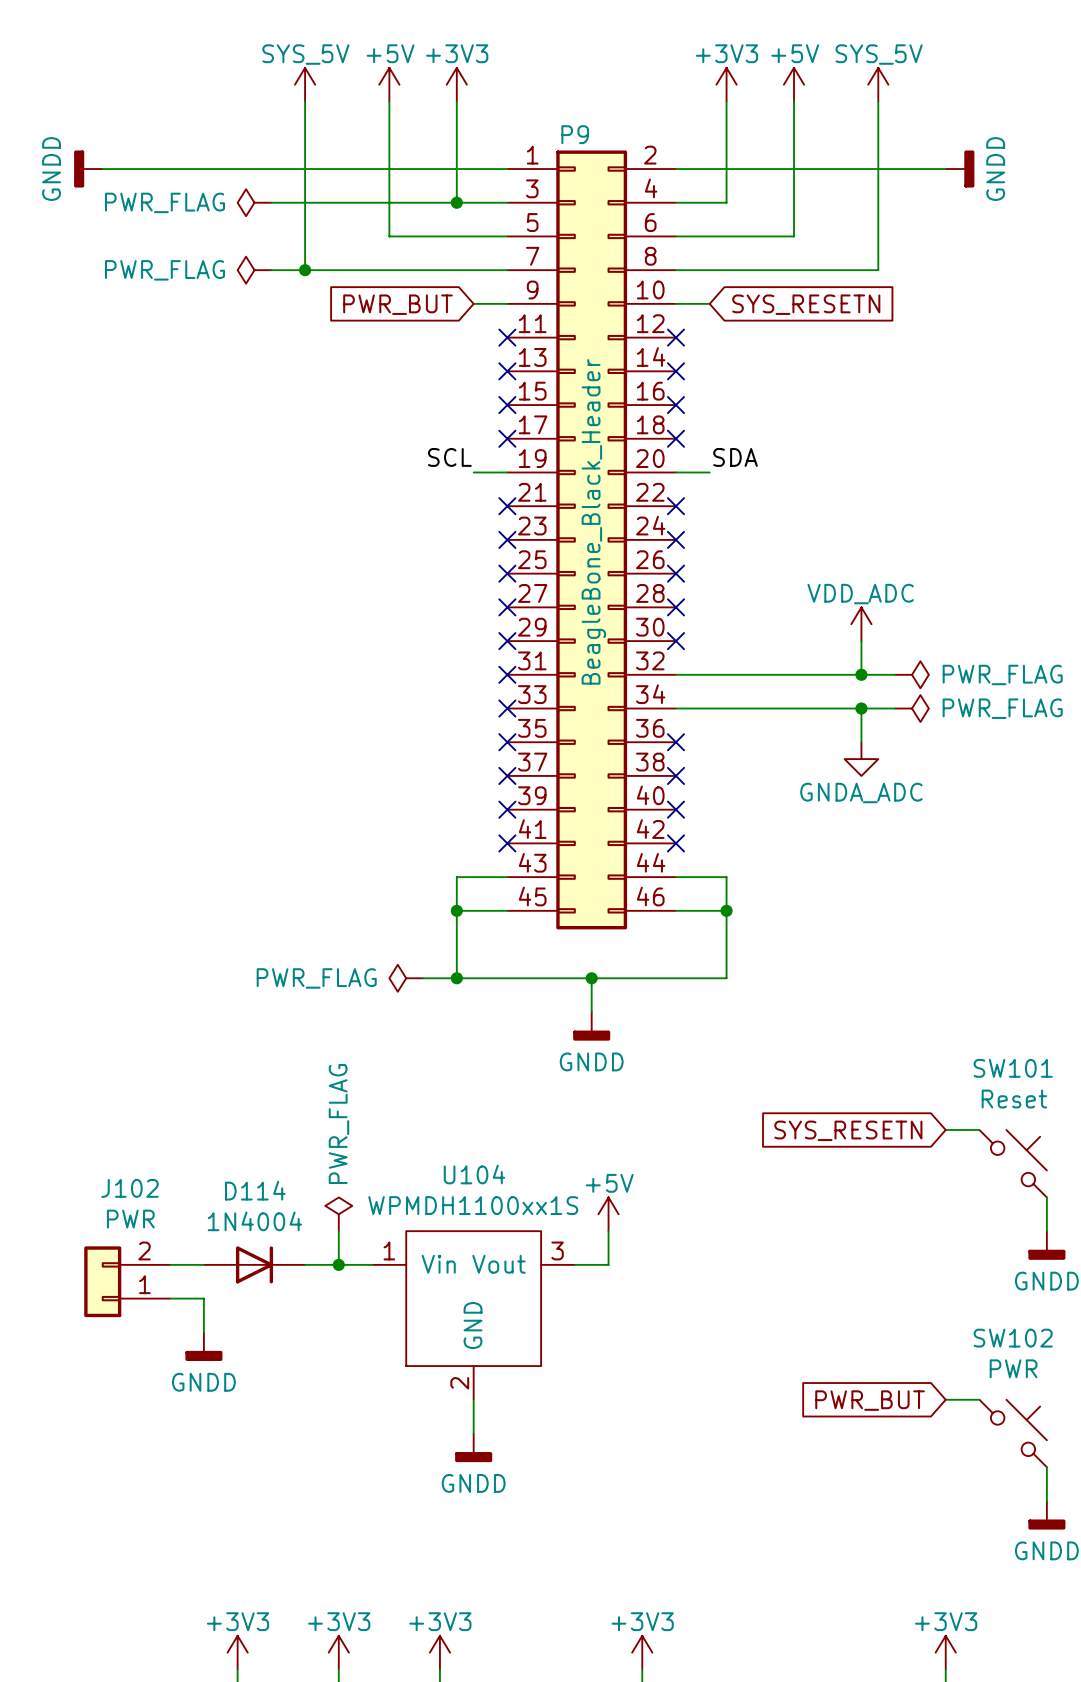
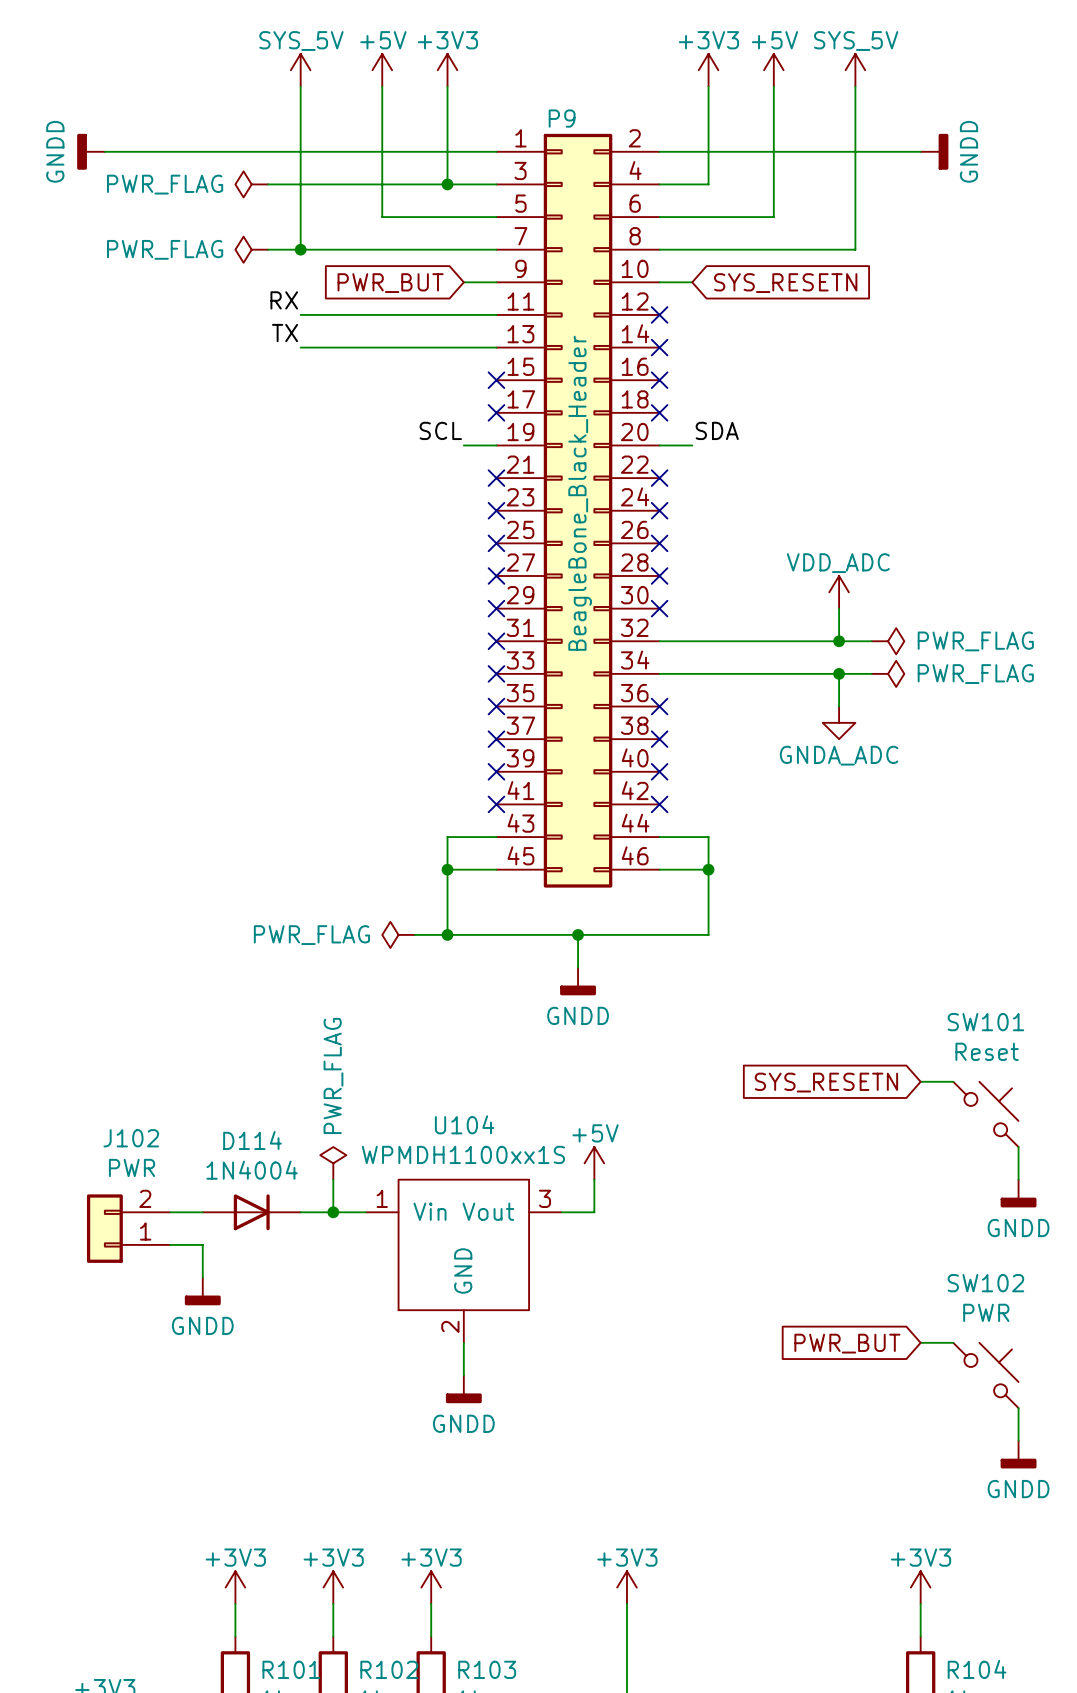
label: none -> RX (284, 300)
wire: none -> (300, 314) (496, 314)
no-connect mark: (507, 337) -> none
label: none -> TX (285, 333)
wire: none -> (300, 347) (496, 347)
no-connect mark: (507, 371) -> none

